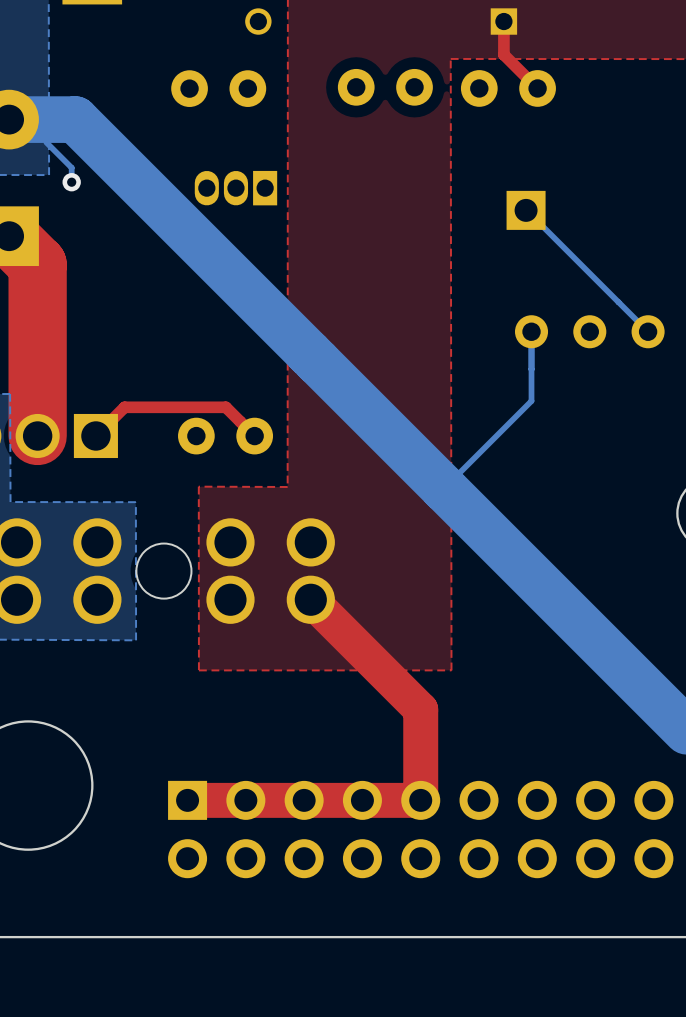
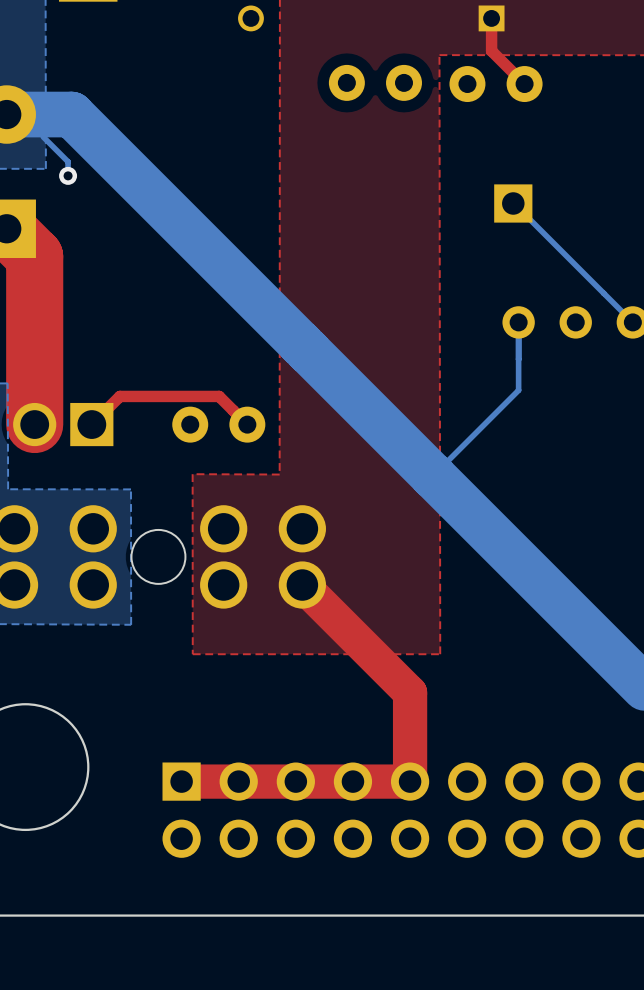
part: (218, 88) -> none
part: (235, 188) -> none

